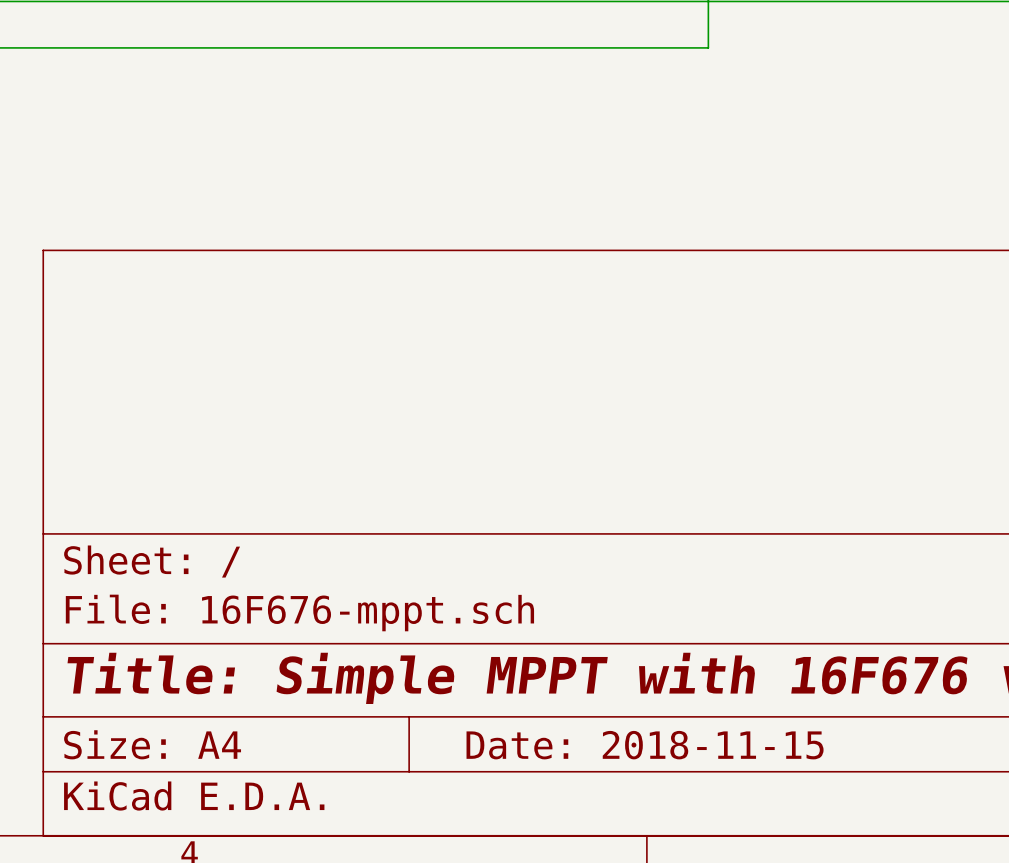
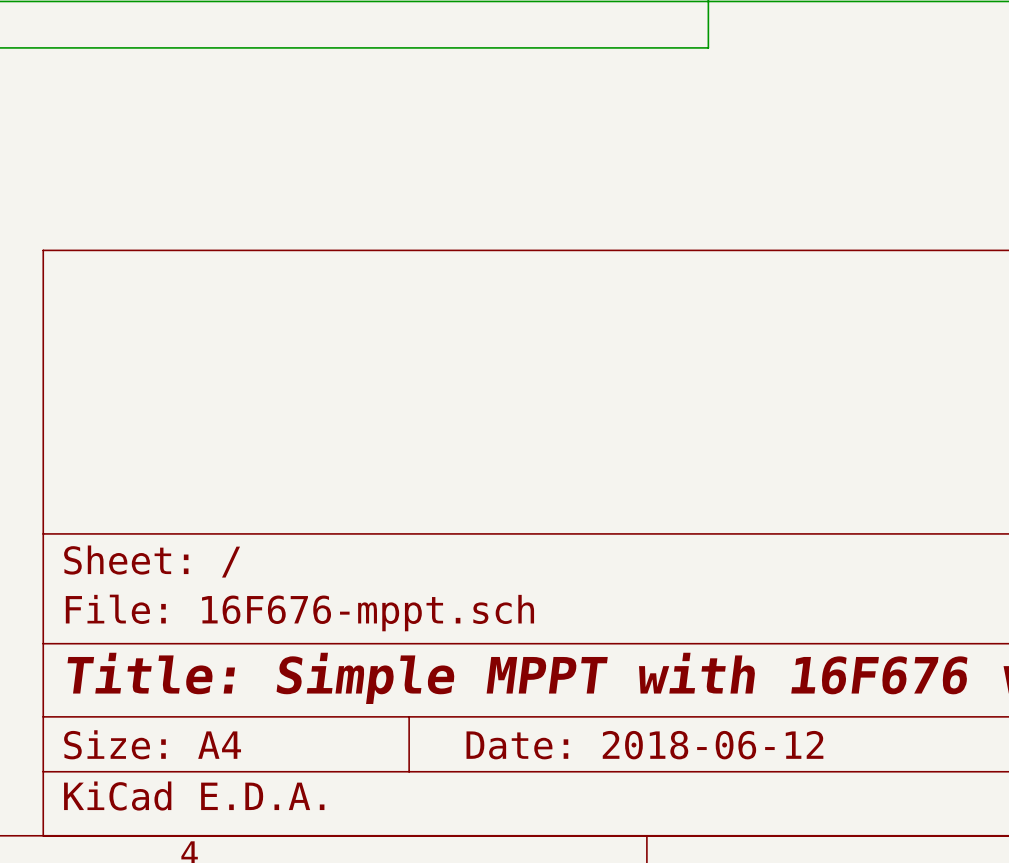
title block: Date: 2018-11-15 (645, 745) -> Date: 2018-06-12 (644, 745)

